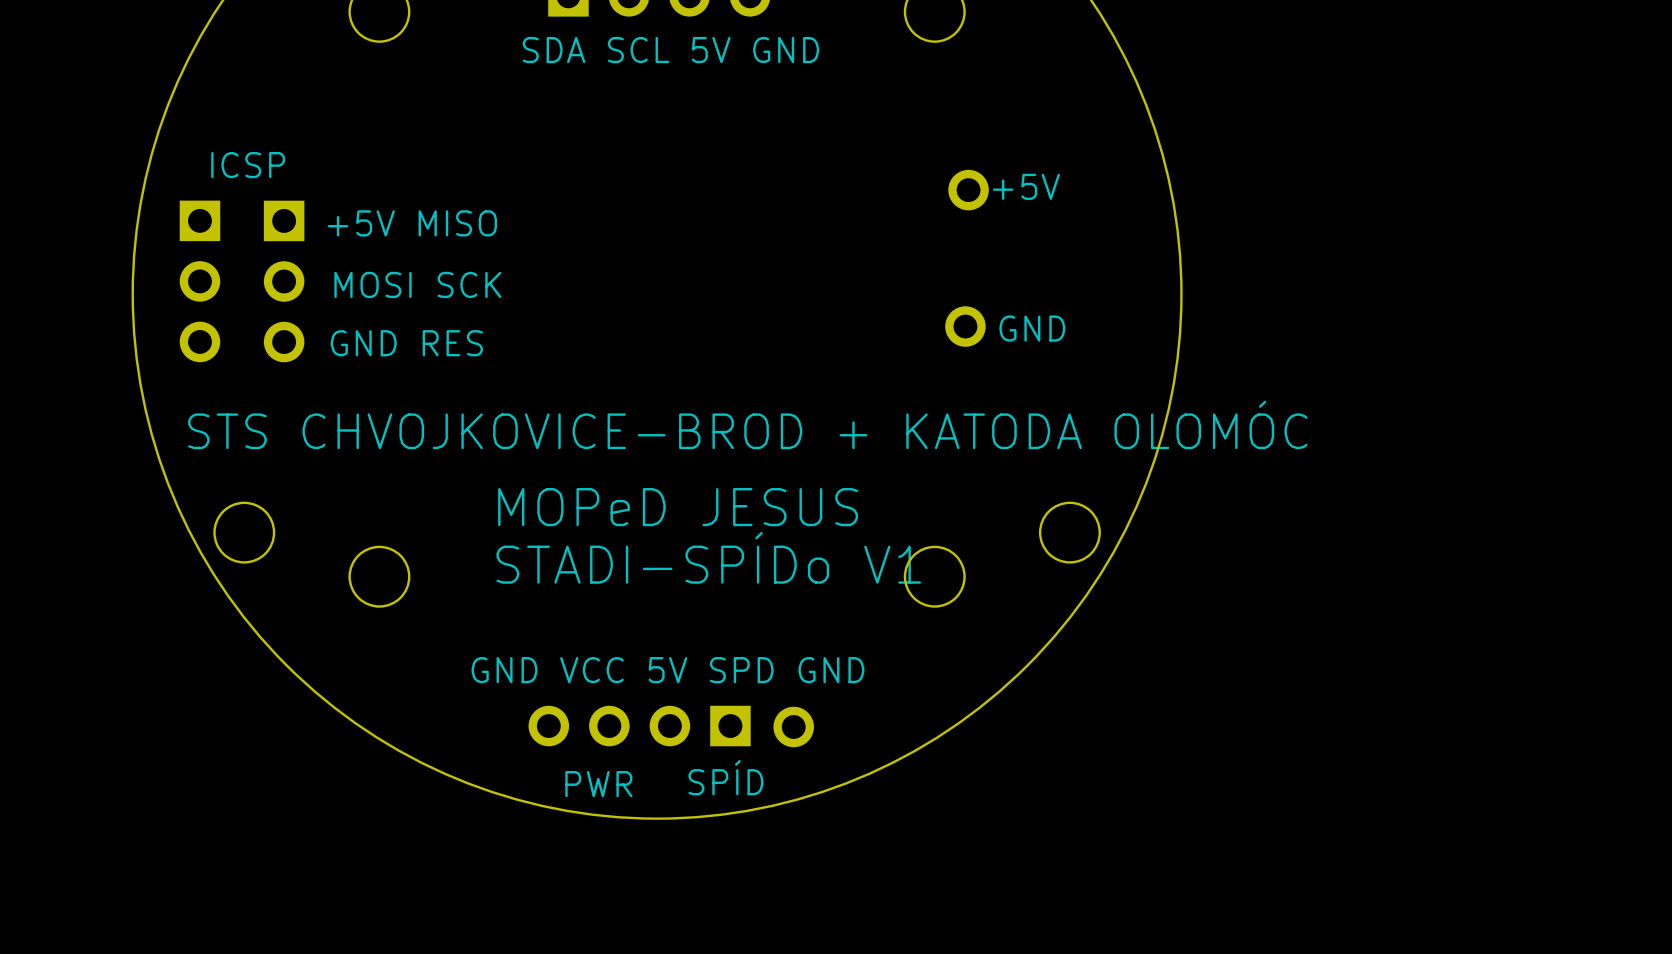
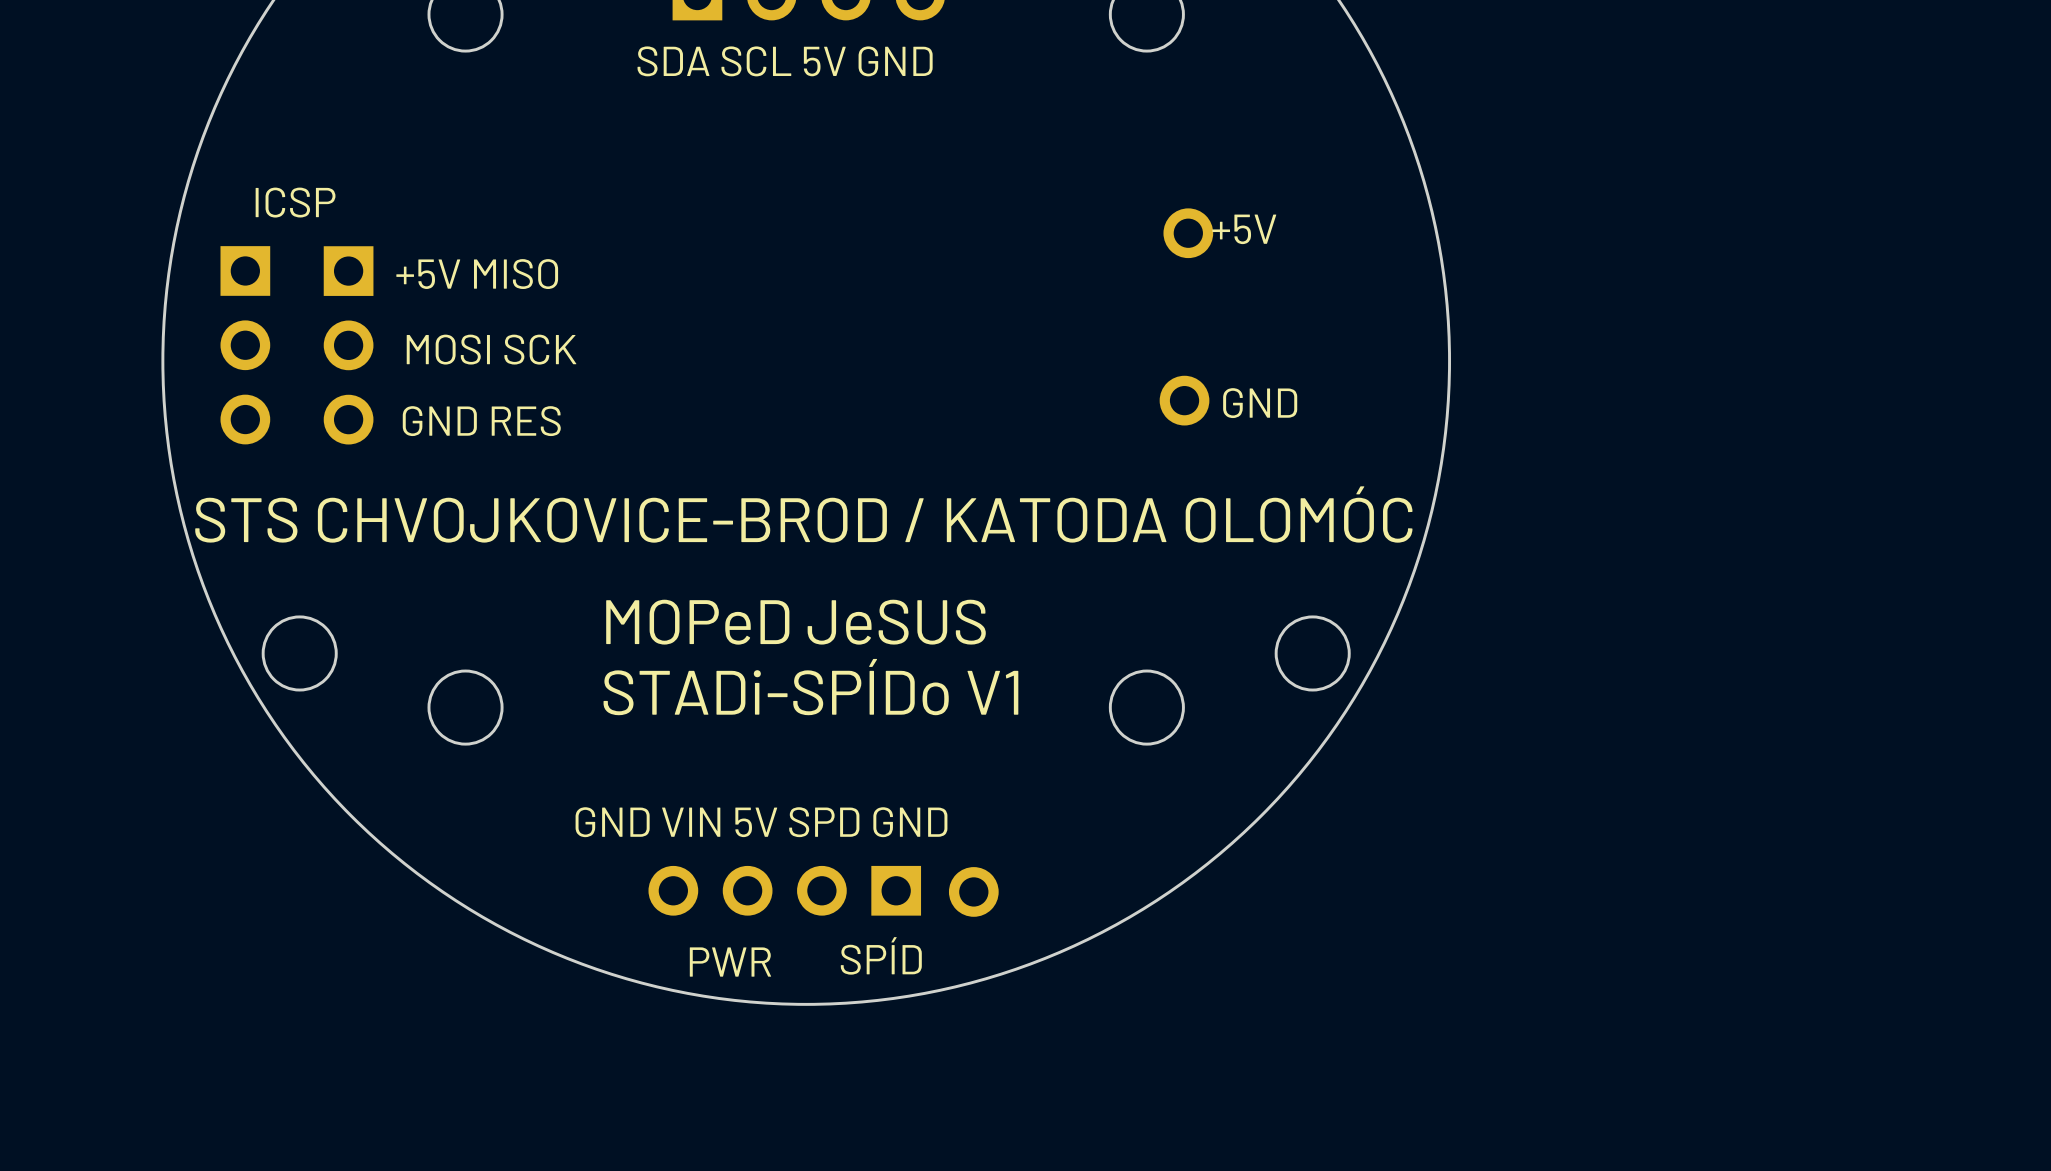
text: STS CHVOJKOVICE-BROD + KATODA OLOMÓC (747, 424) -> STS CHVOJKOVICE-BROD / KATODA OLOMÓC (803, 514)
text: MOPeD JESUS (678, 507) -> MOPeD JeSUS (795, 622)
text: STADI-SPÍDo V1 (708, 557) -> STADi-SPÍDo V1 (810, 687)
text: GND VCC 5V SPD GND (668, 670) -> GND VIN 5V SPD GND (761, 822)

